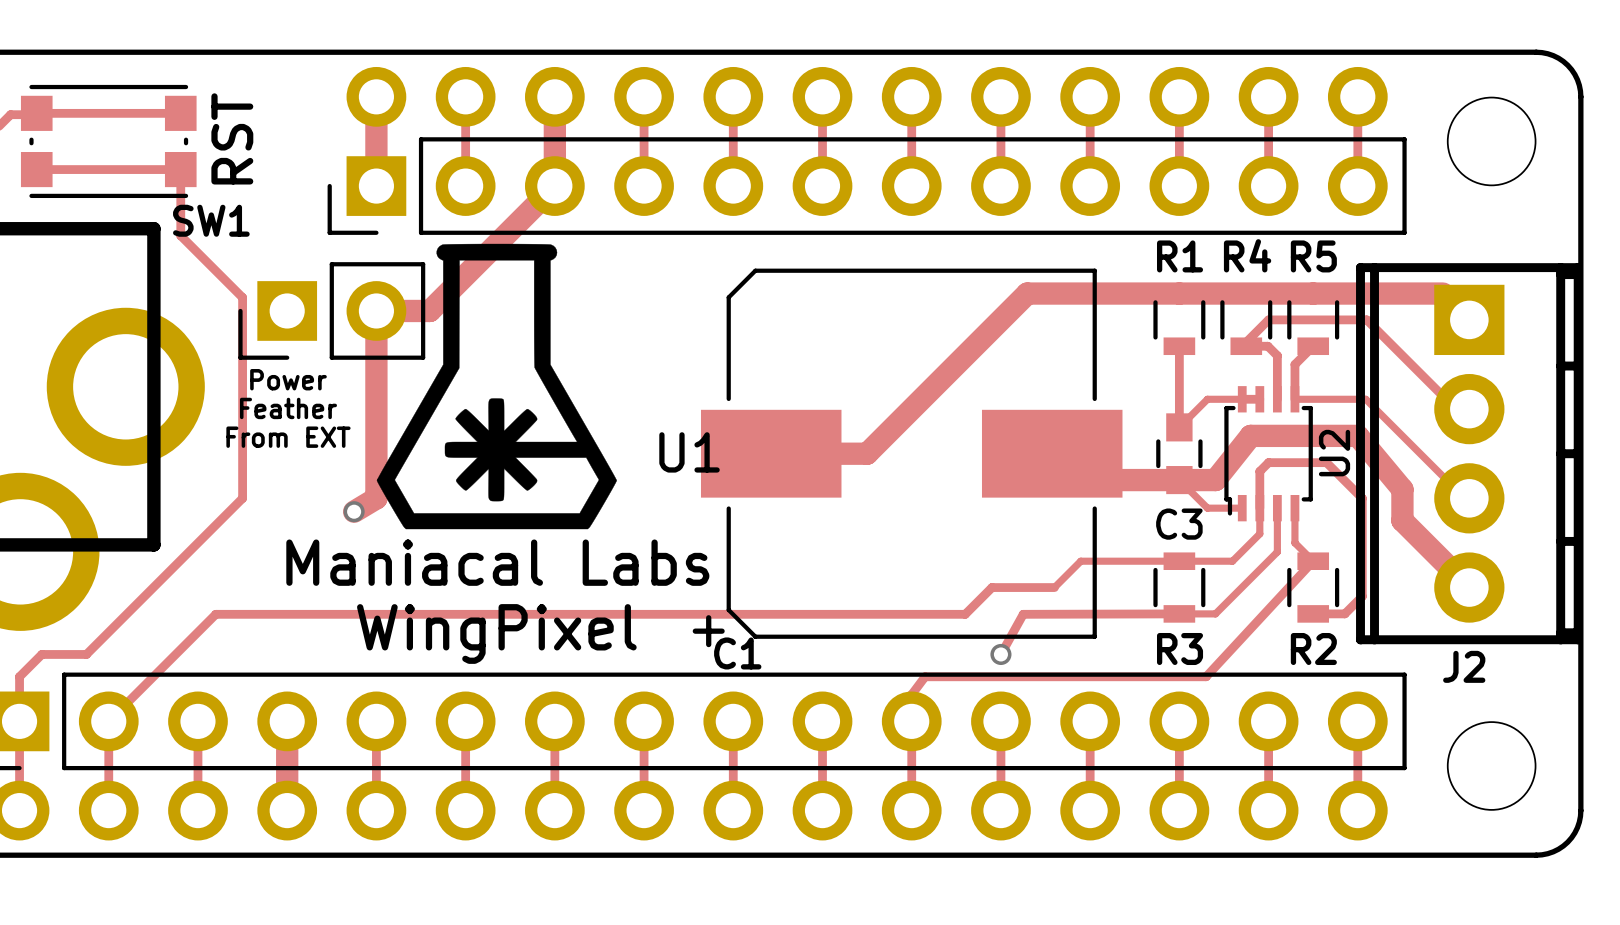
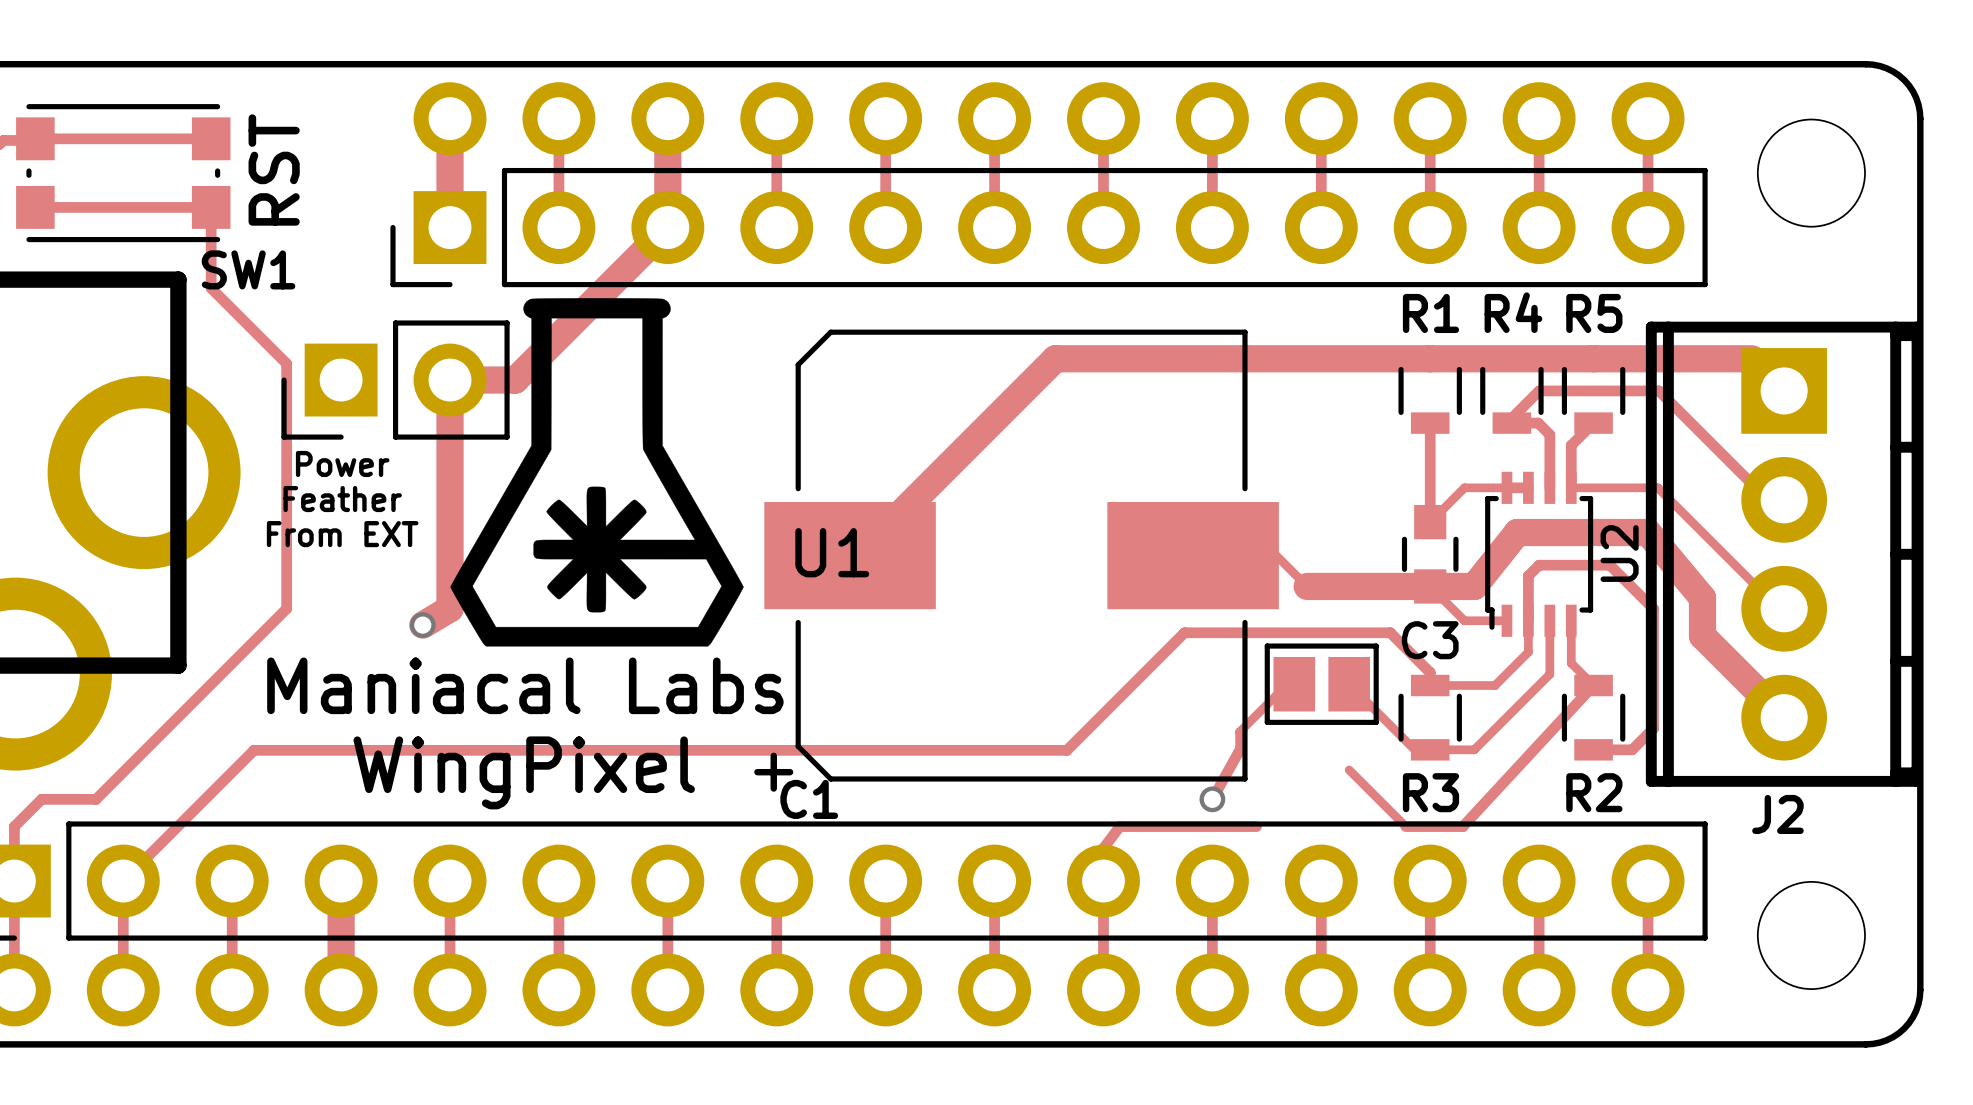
track: (1027, 293) (867, 453) (771, 453) -> (1244, 358) (1055, 358) (858, 555) (850, 555)
C1 position: (911, 453) -> (1021, 555)
track: none -> (1294, 684) (1287, 684) (1239, 732) (1239, 750)
part: none -> (1321, 684)
track: (1168, 561) (1080, 561) (1054, 587) (992, 587) (965, 614) (881, 614) -> (1430, 685) (1430, 672) (1390, 632) (1184, 632) (1066, 750)
text position: Maniacal Labs (497, 562) -> Maniacal Labs (525, 685)
track: (1179, 613) (1023, 614) -> (1430, 749) (1414, 749) (1349, 684)
text position: WingPixel (496, 633) -> WingPixel (524, 772)
track: (1037, 676) (1159, 676) -> (1349, 769) (1405, 826)

